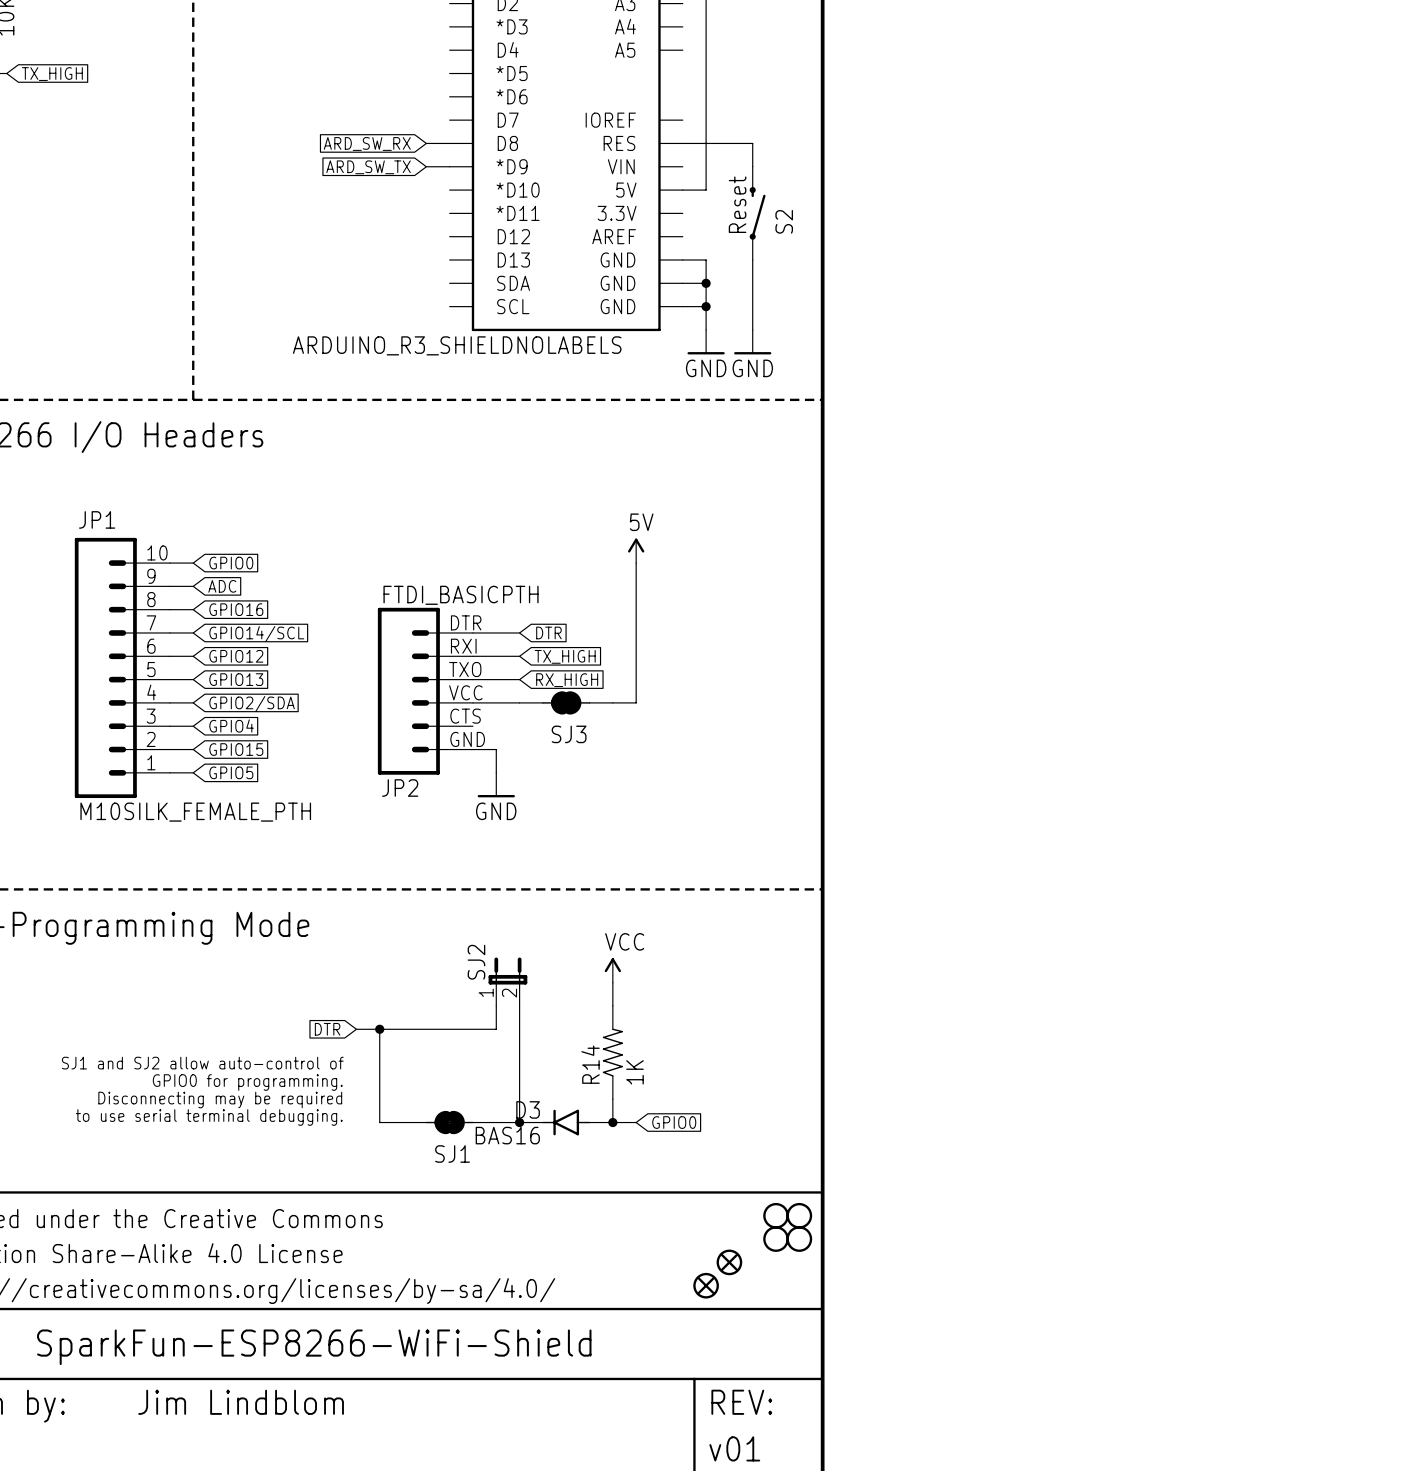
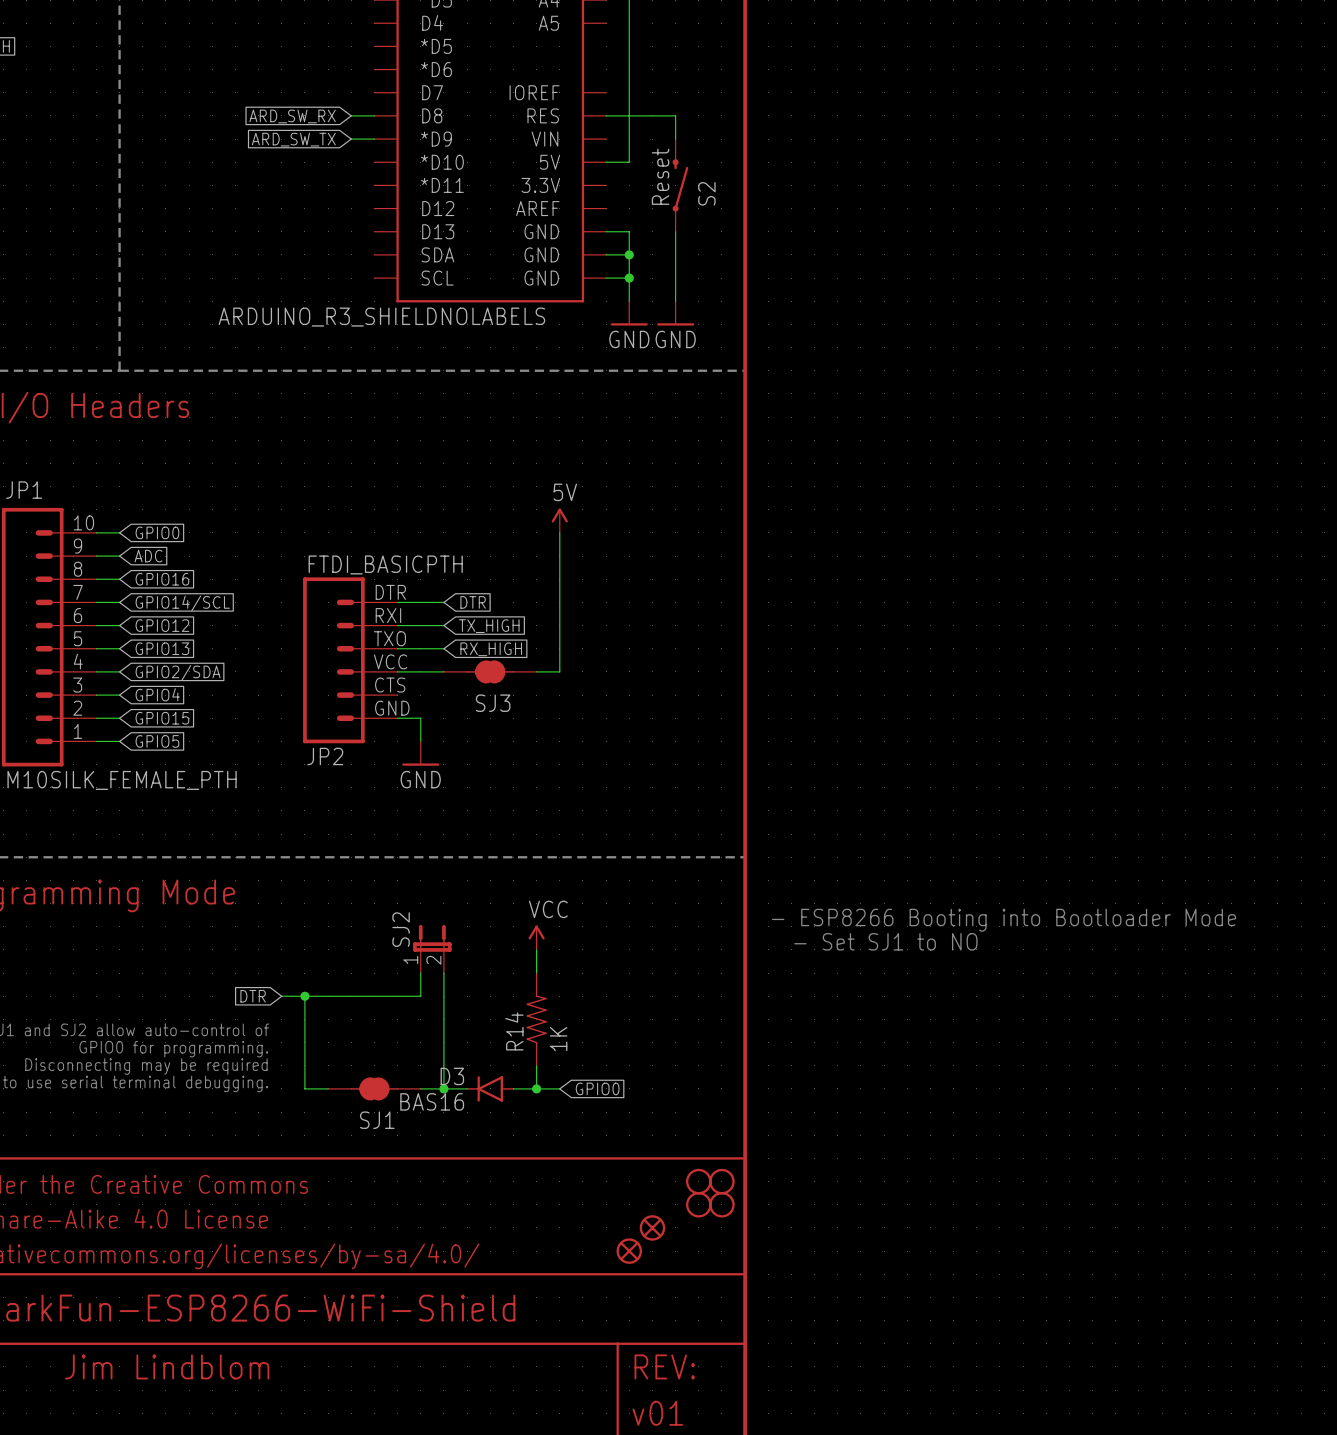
text: none -> - ESP8266 Booting into Bootloader Mode (1004, 920)
text: none -> - Set SJ1 to NO (885, 941)

